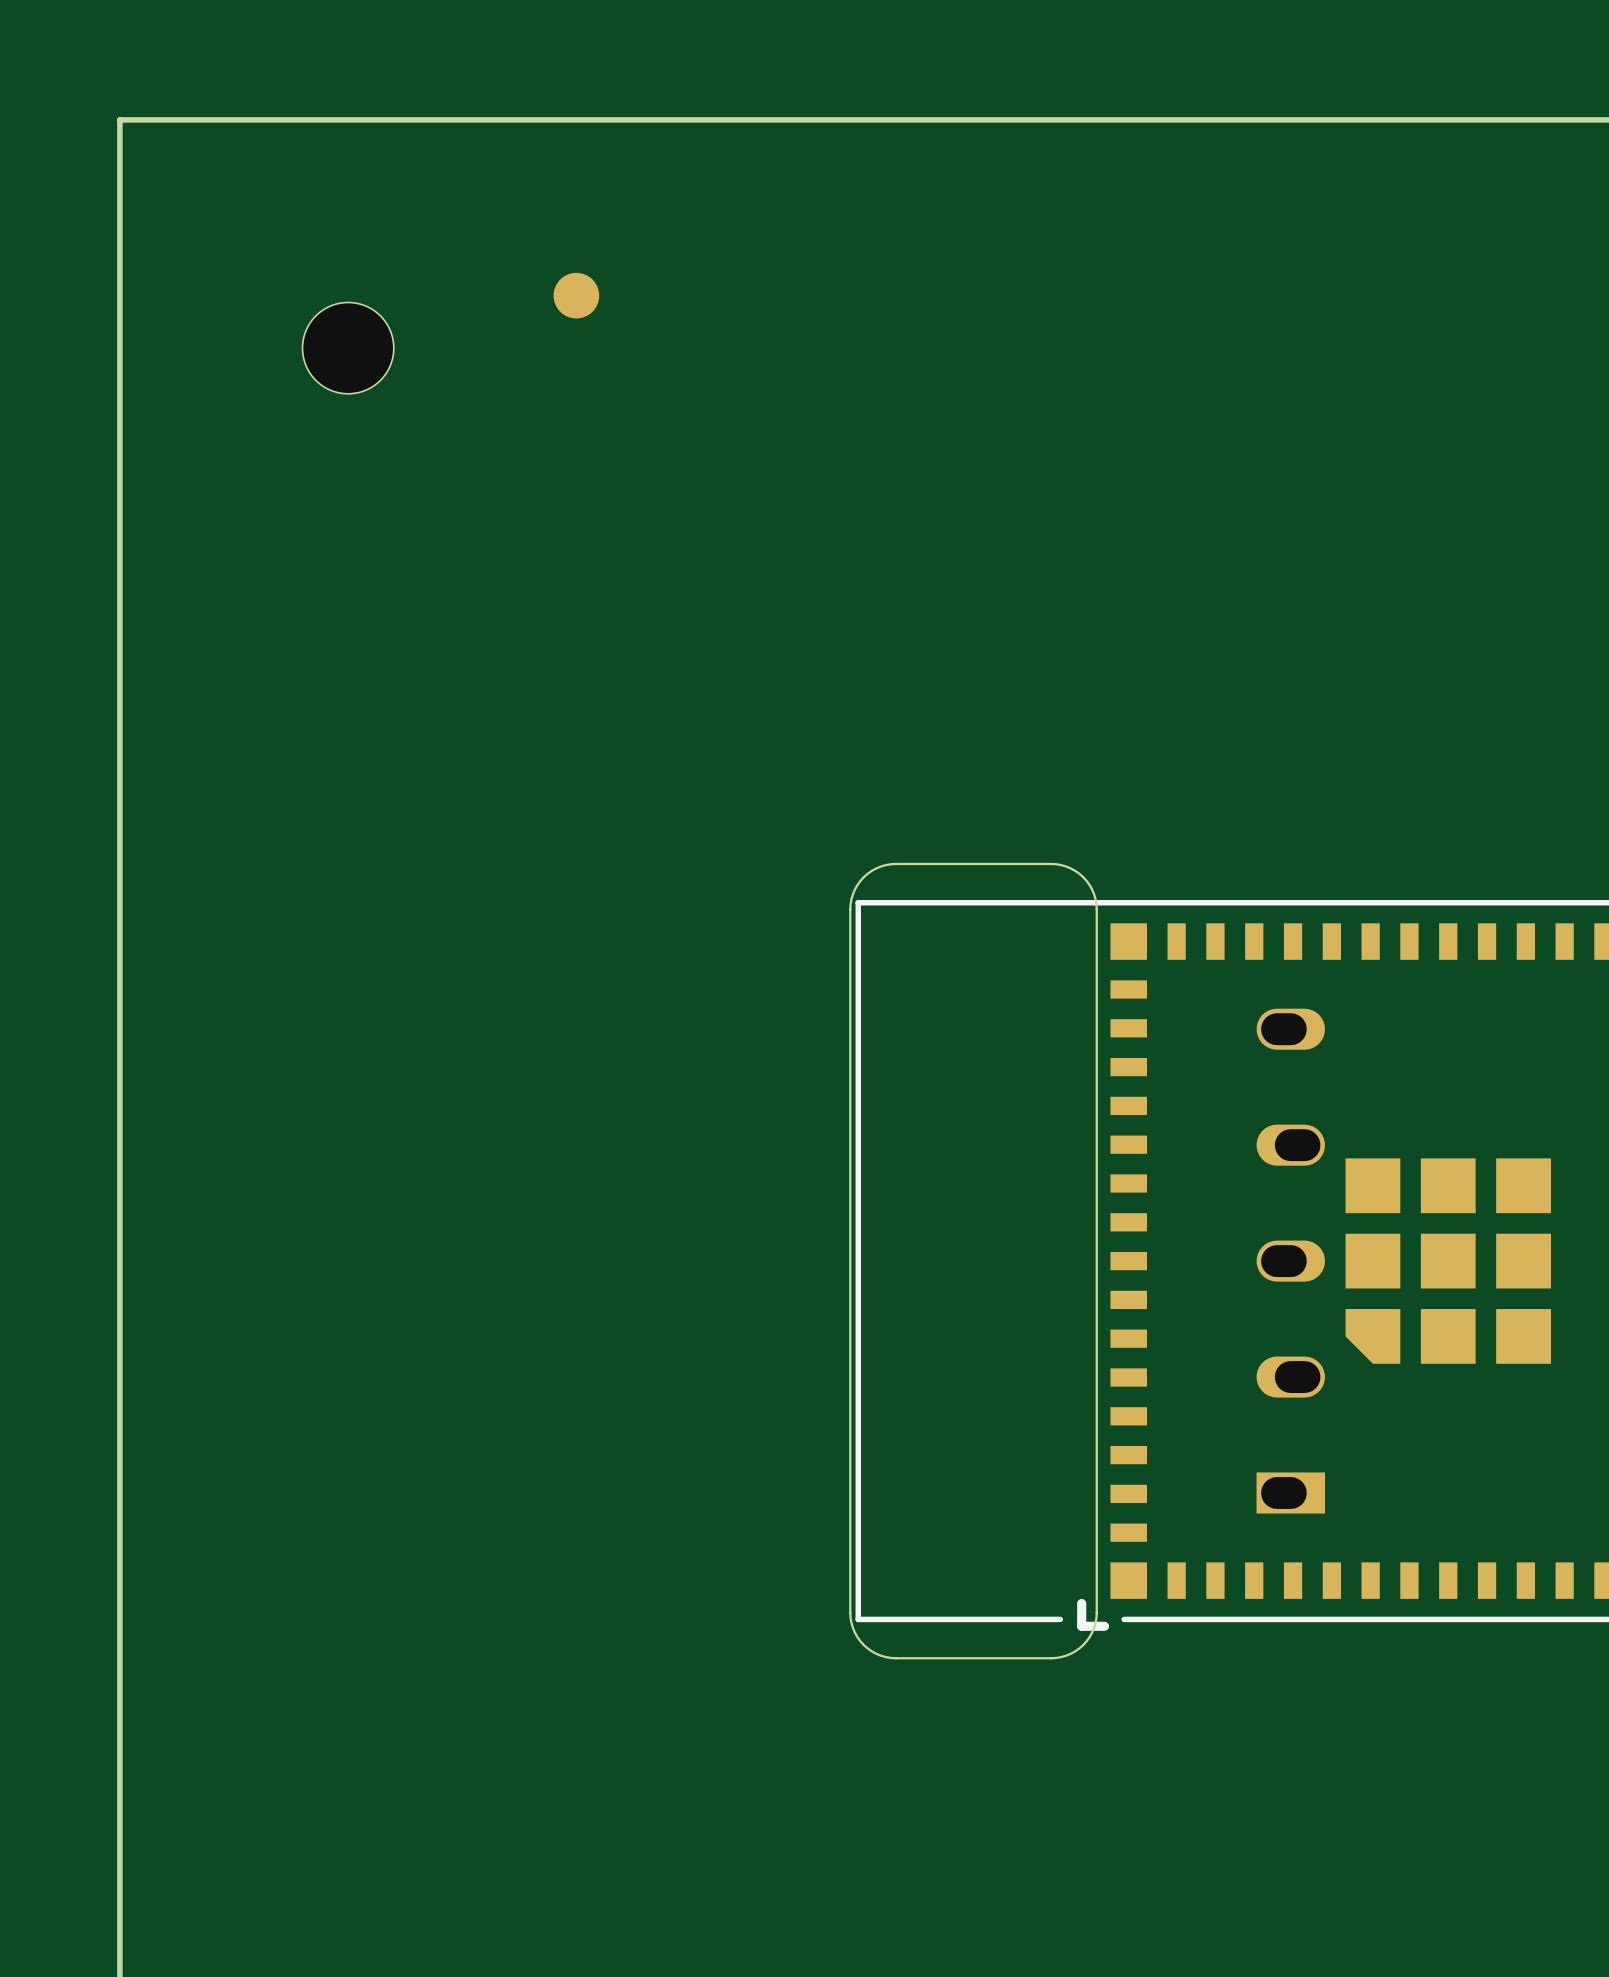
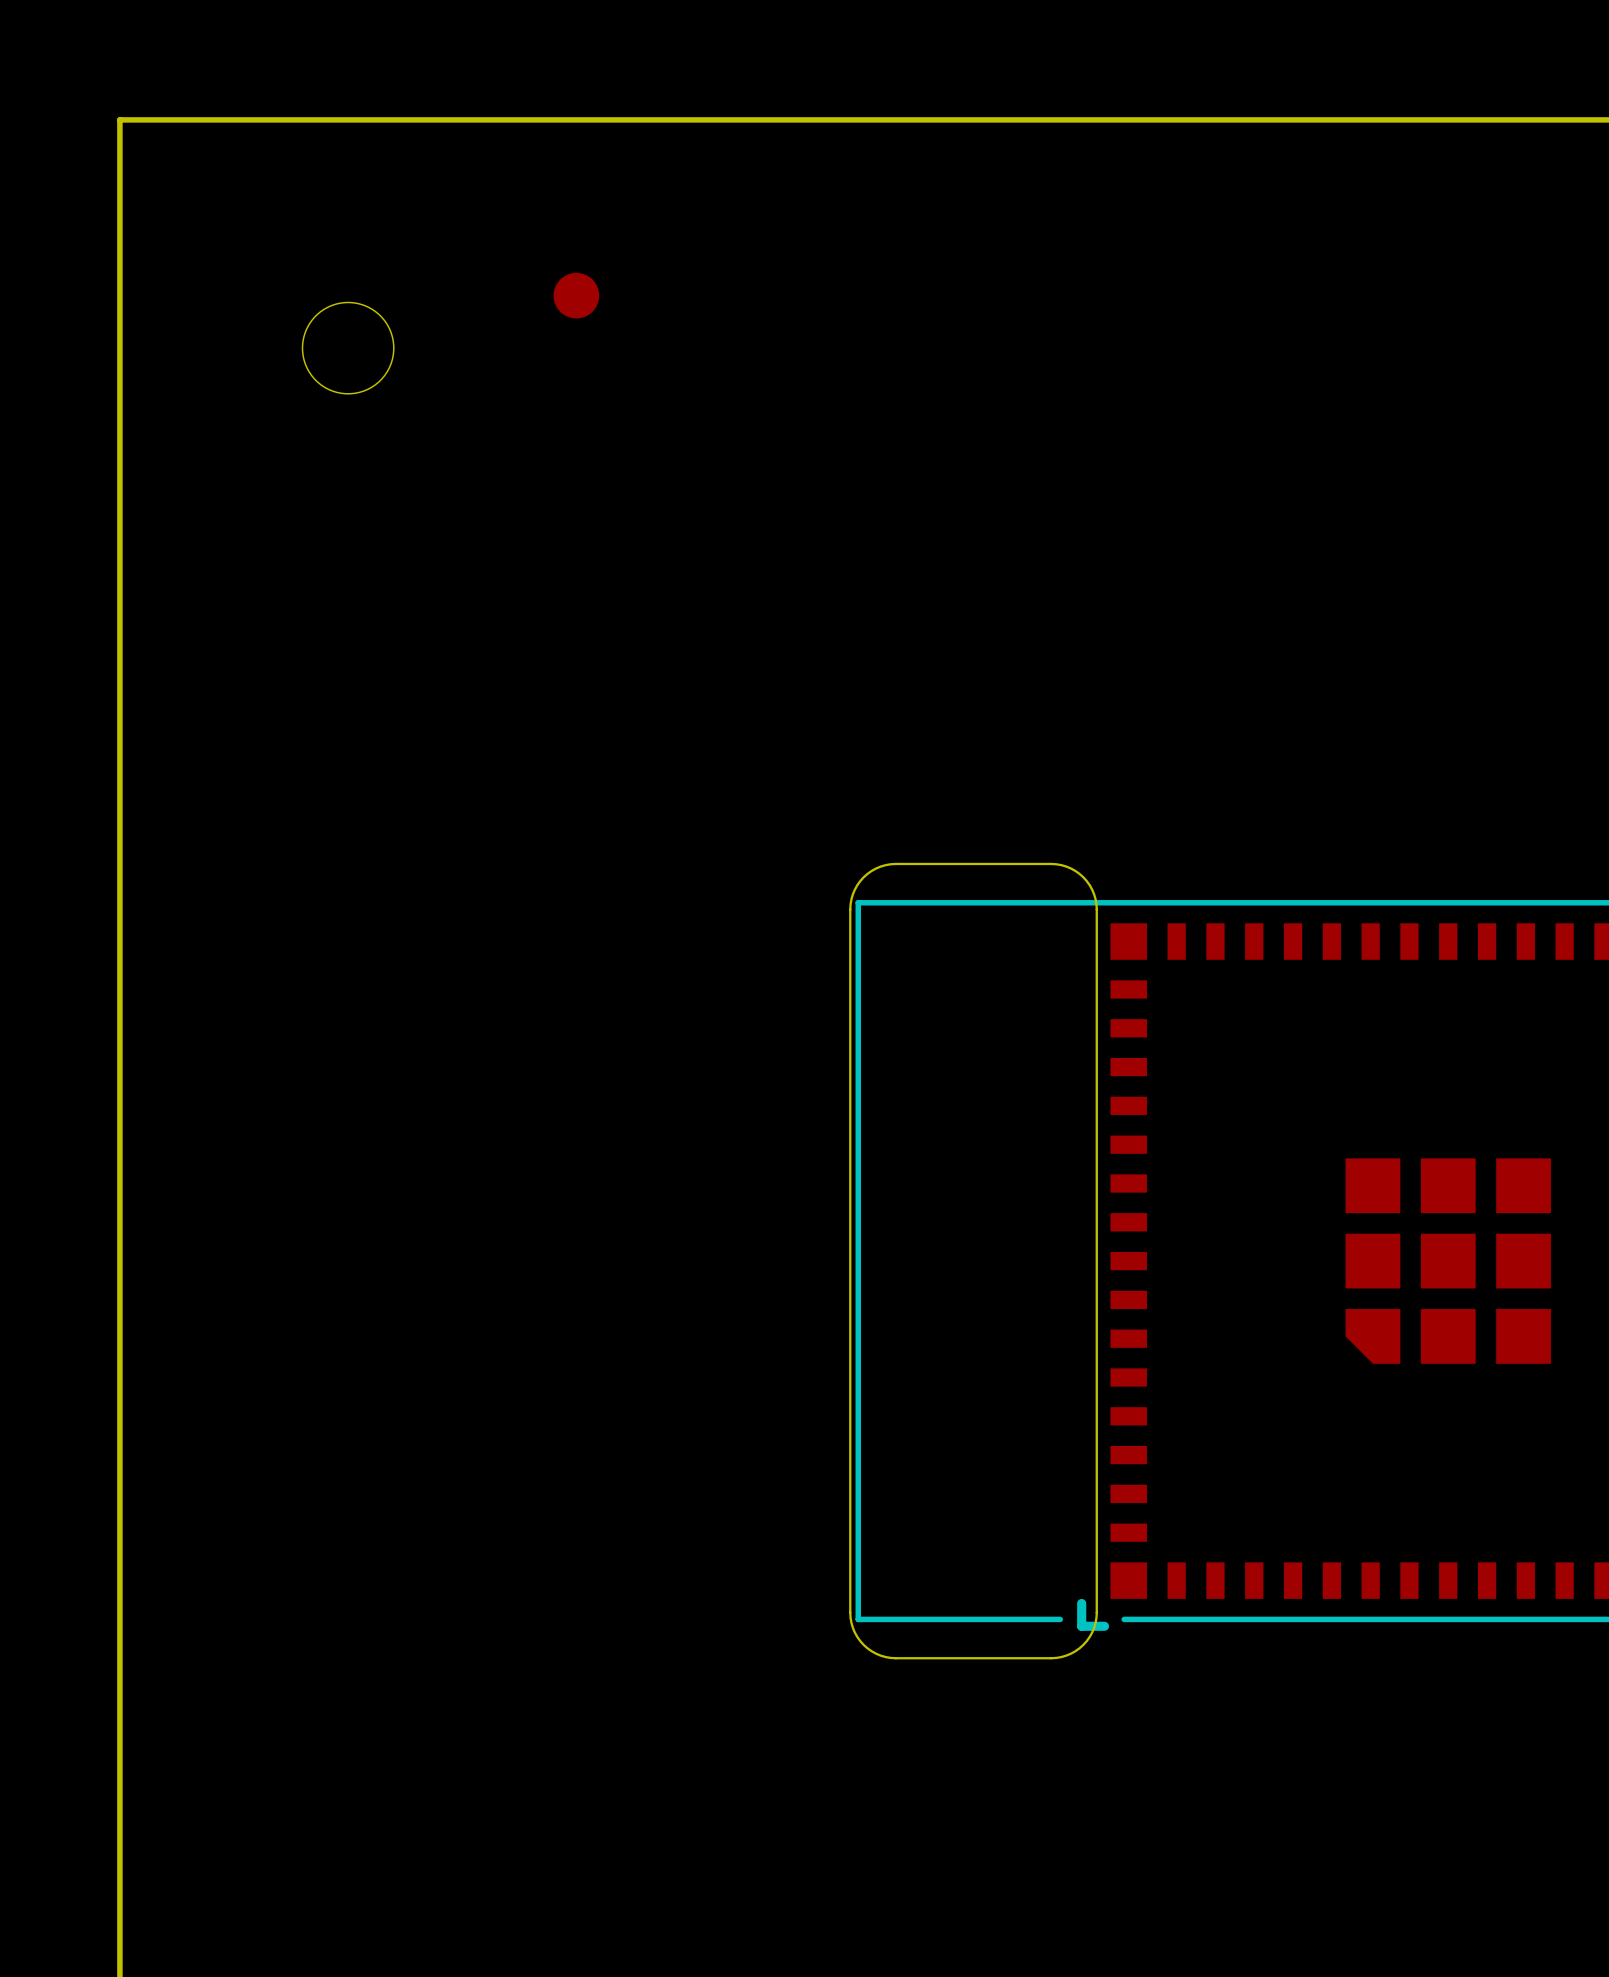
part: (1290, 1261) -> none

